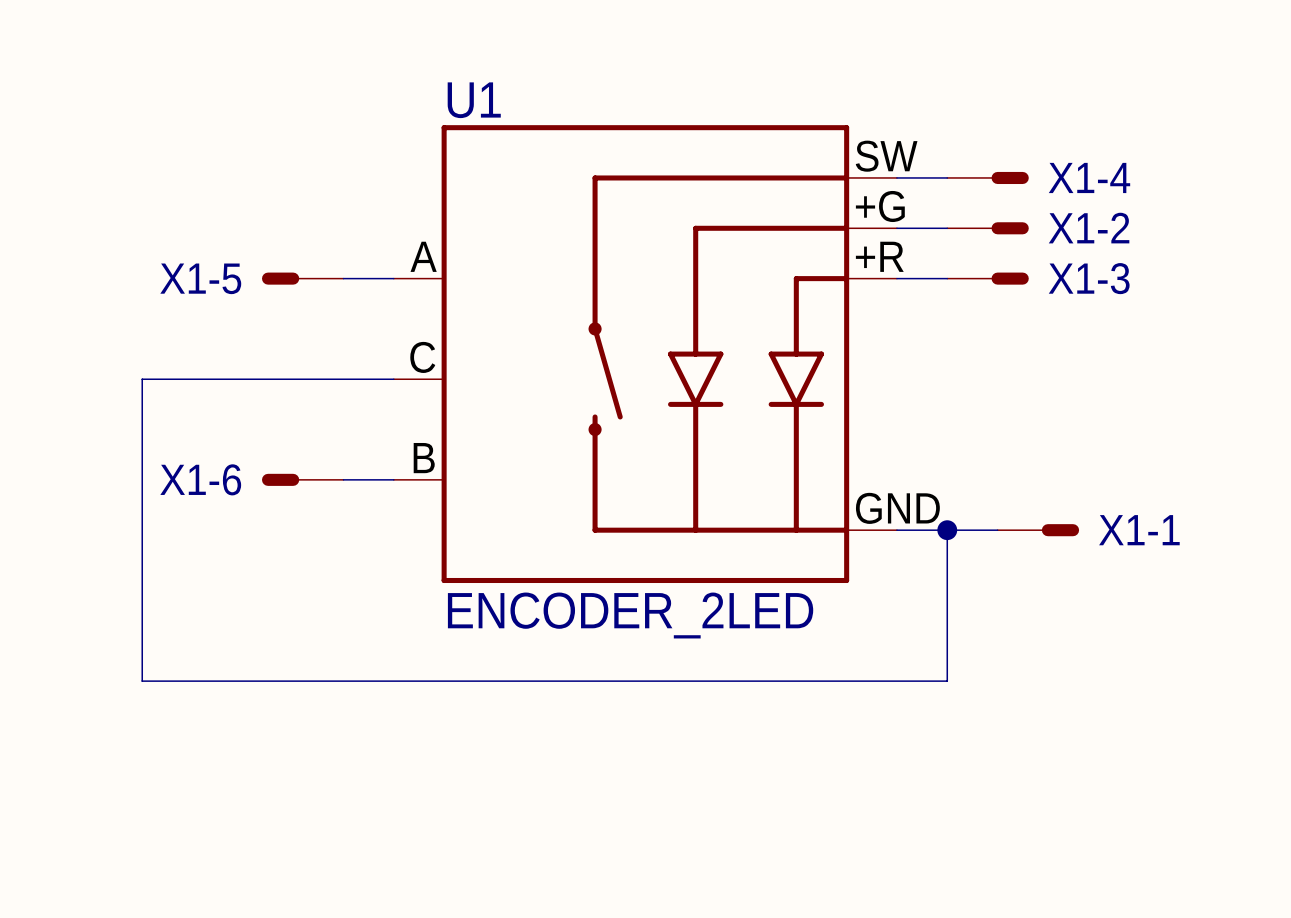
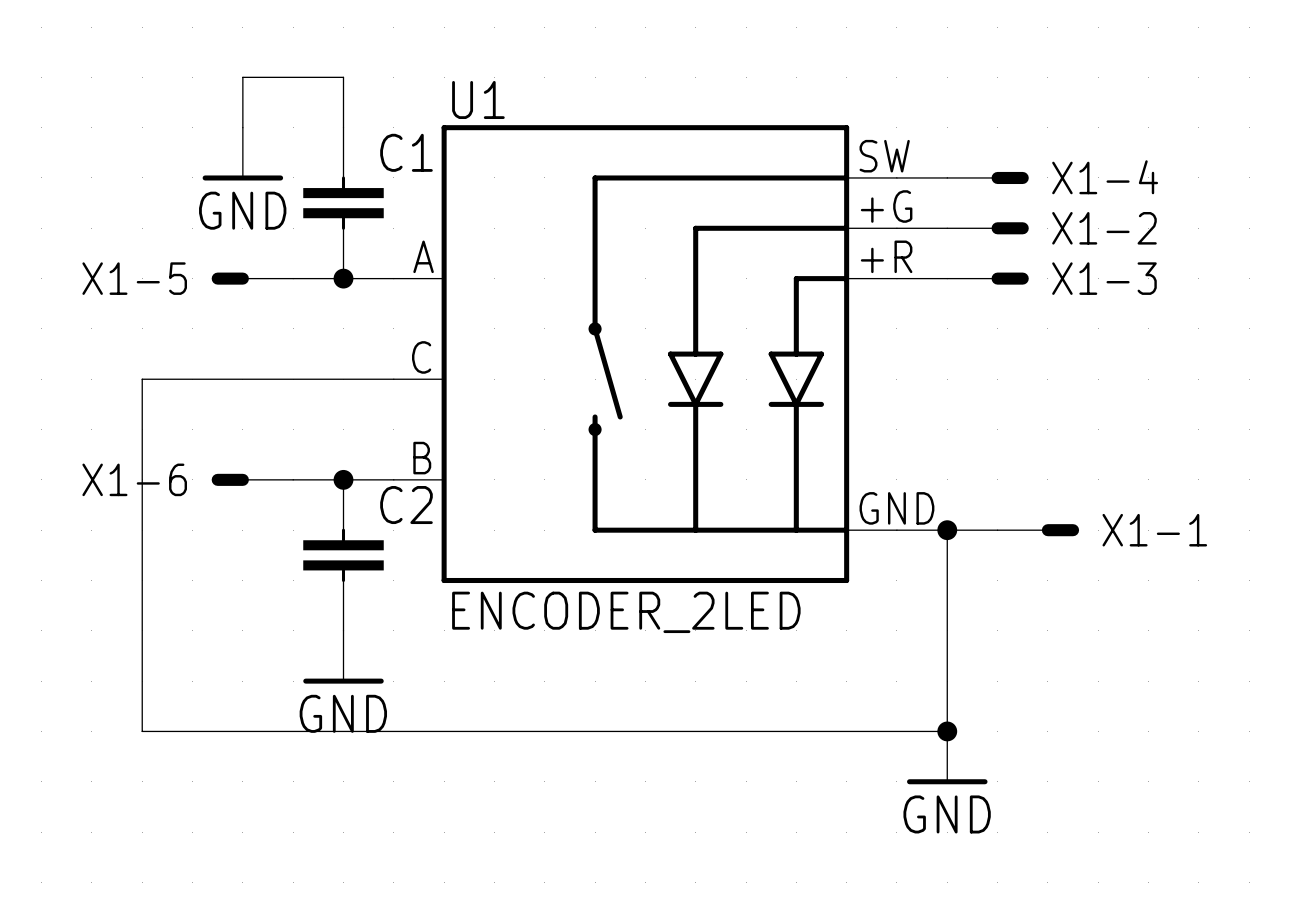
wire: none -> (242, 127) (242, 77) (343, 77) (343, 127)
power symbol: none -> GND (242, 154)
C1: none -> (343, 203)
X1-5 position: (302, 278) -> (252, 278)
junction: none -> (343, 278)
X1-6 position: (302, 479) -> (252, 479)
junction: none -> (343, 479)
C2: none -> (343, 555)
power symbol: none -> GND (343, 657)
wire: (142, 681) (947, 681) -> (142, 681) (142, 731) (947, 731) (947, 681)
junction: none -> (947, 731)
power symbol: none -> GND (947, 757)

